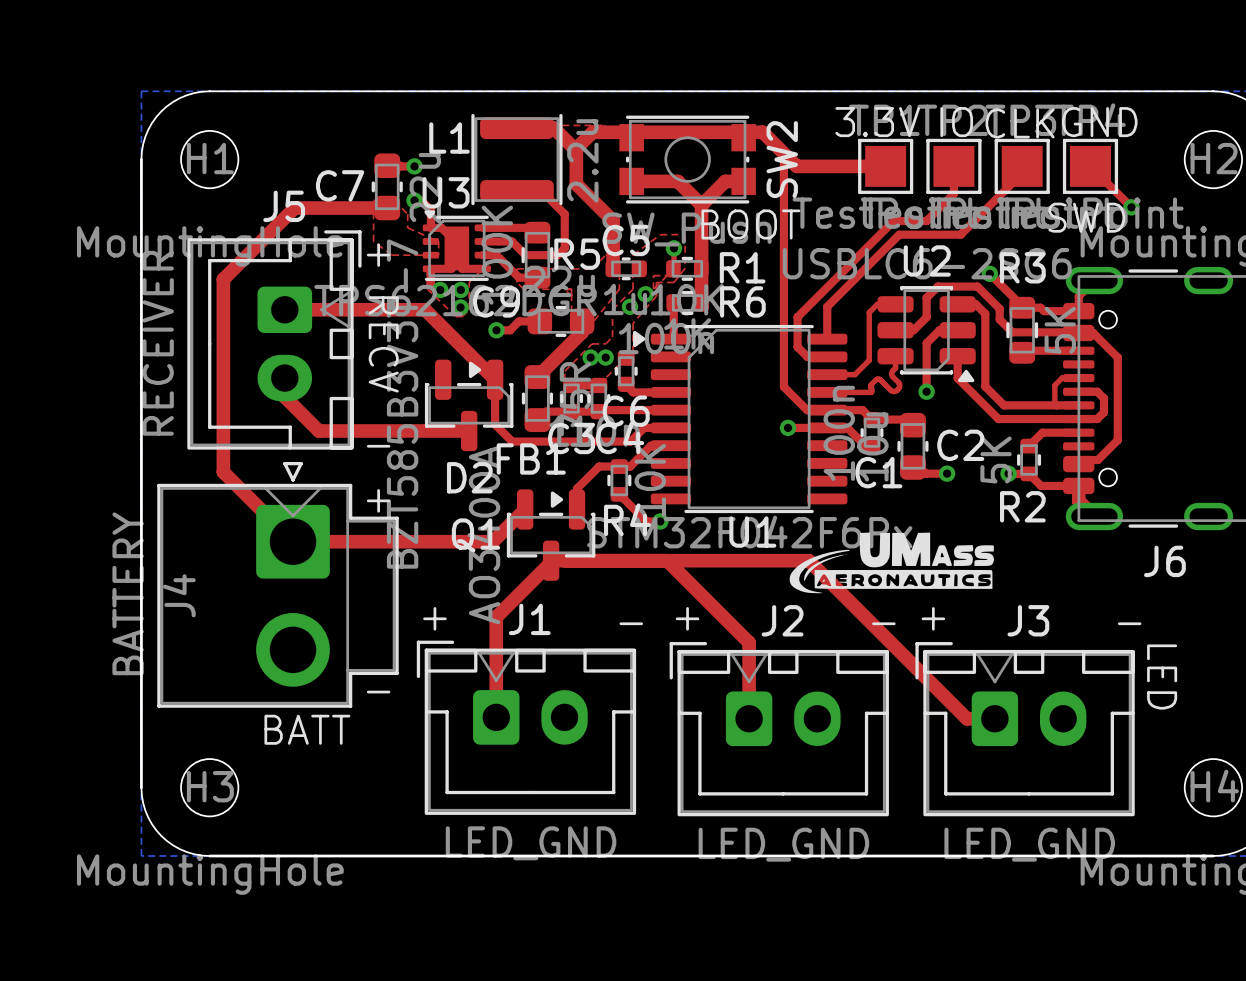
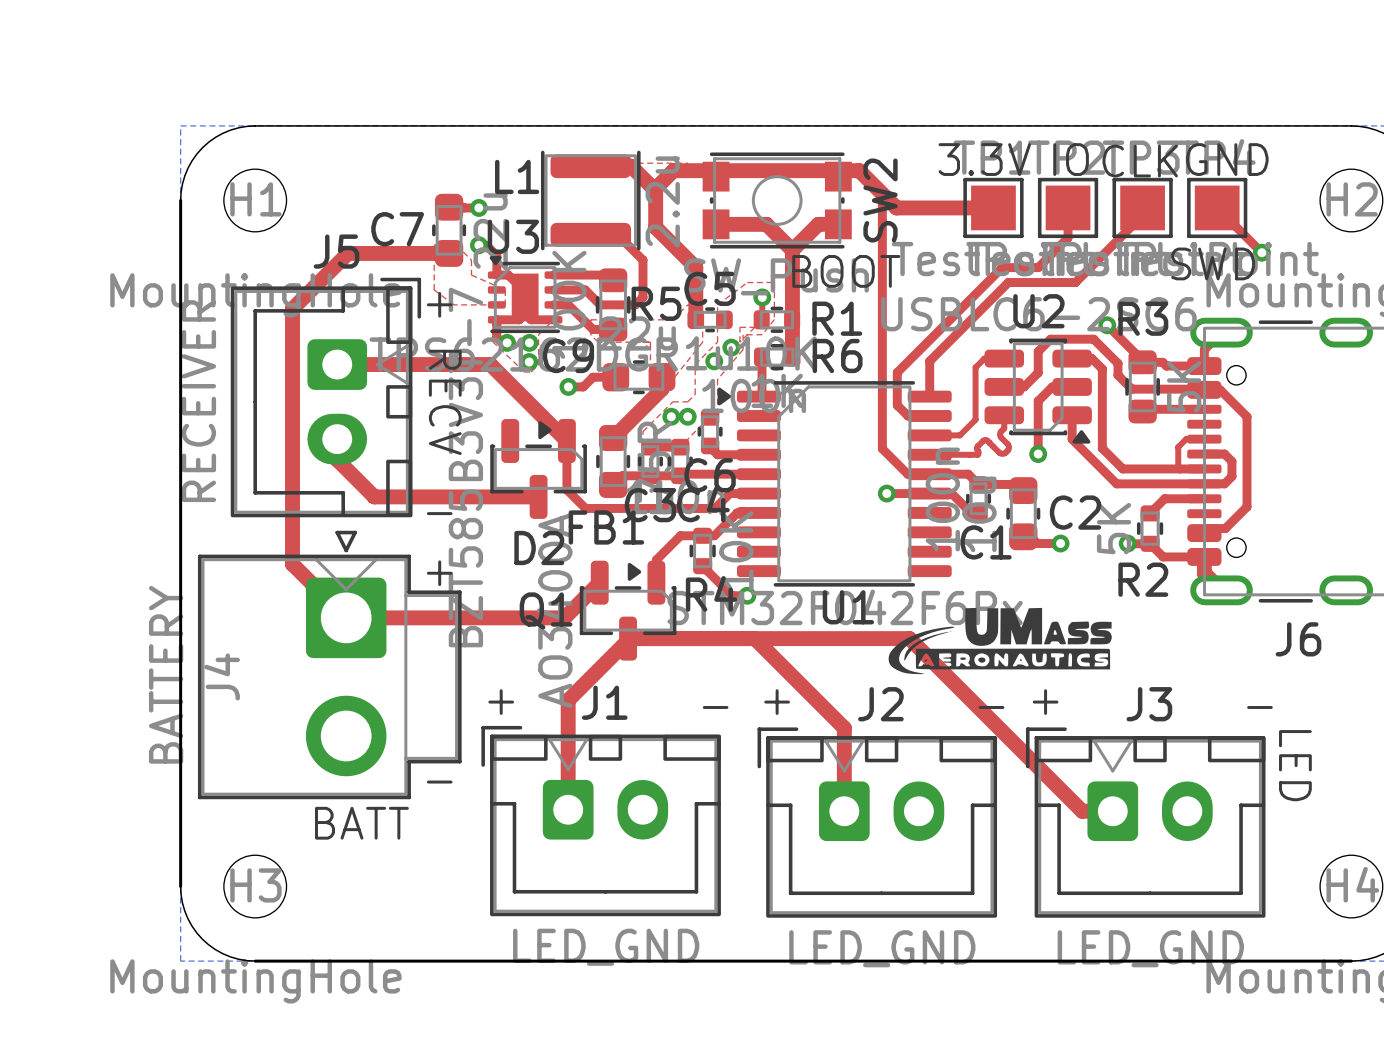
top track: (243, 258) (223, 279) (223, 472) (243, 492) -> (292, 308) (292, 564)

